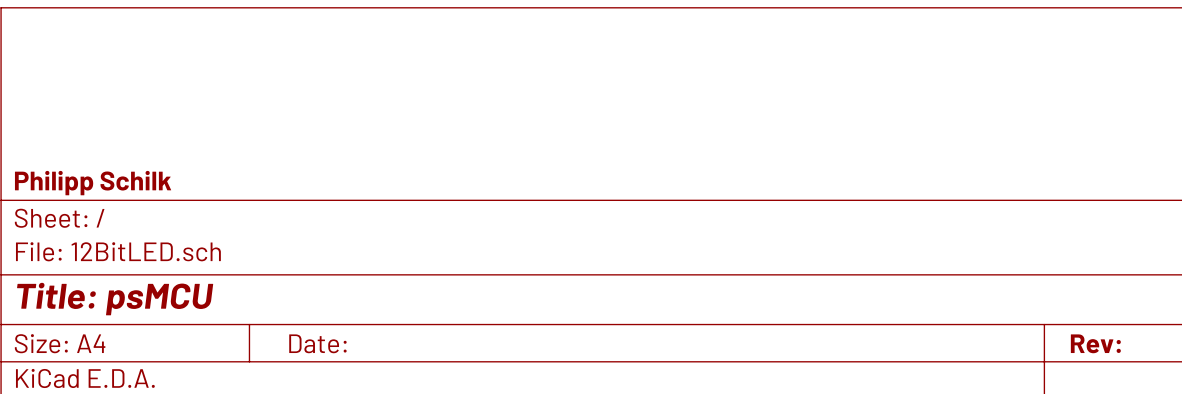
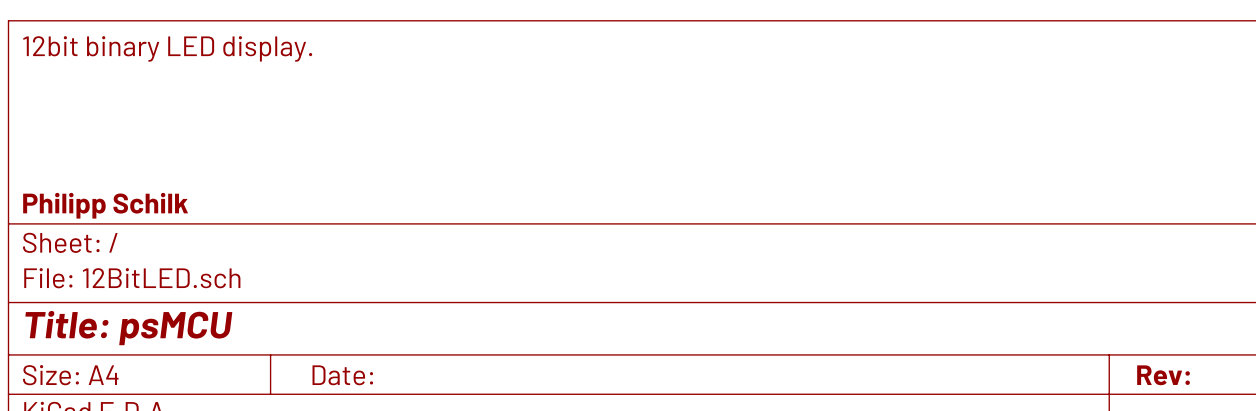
title block: none -> 12bit binary LED display. (167, 48)

